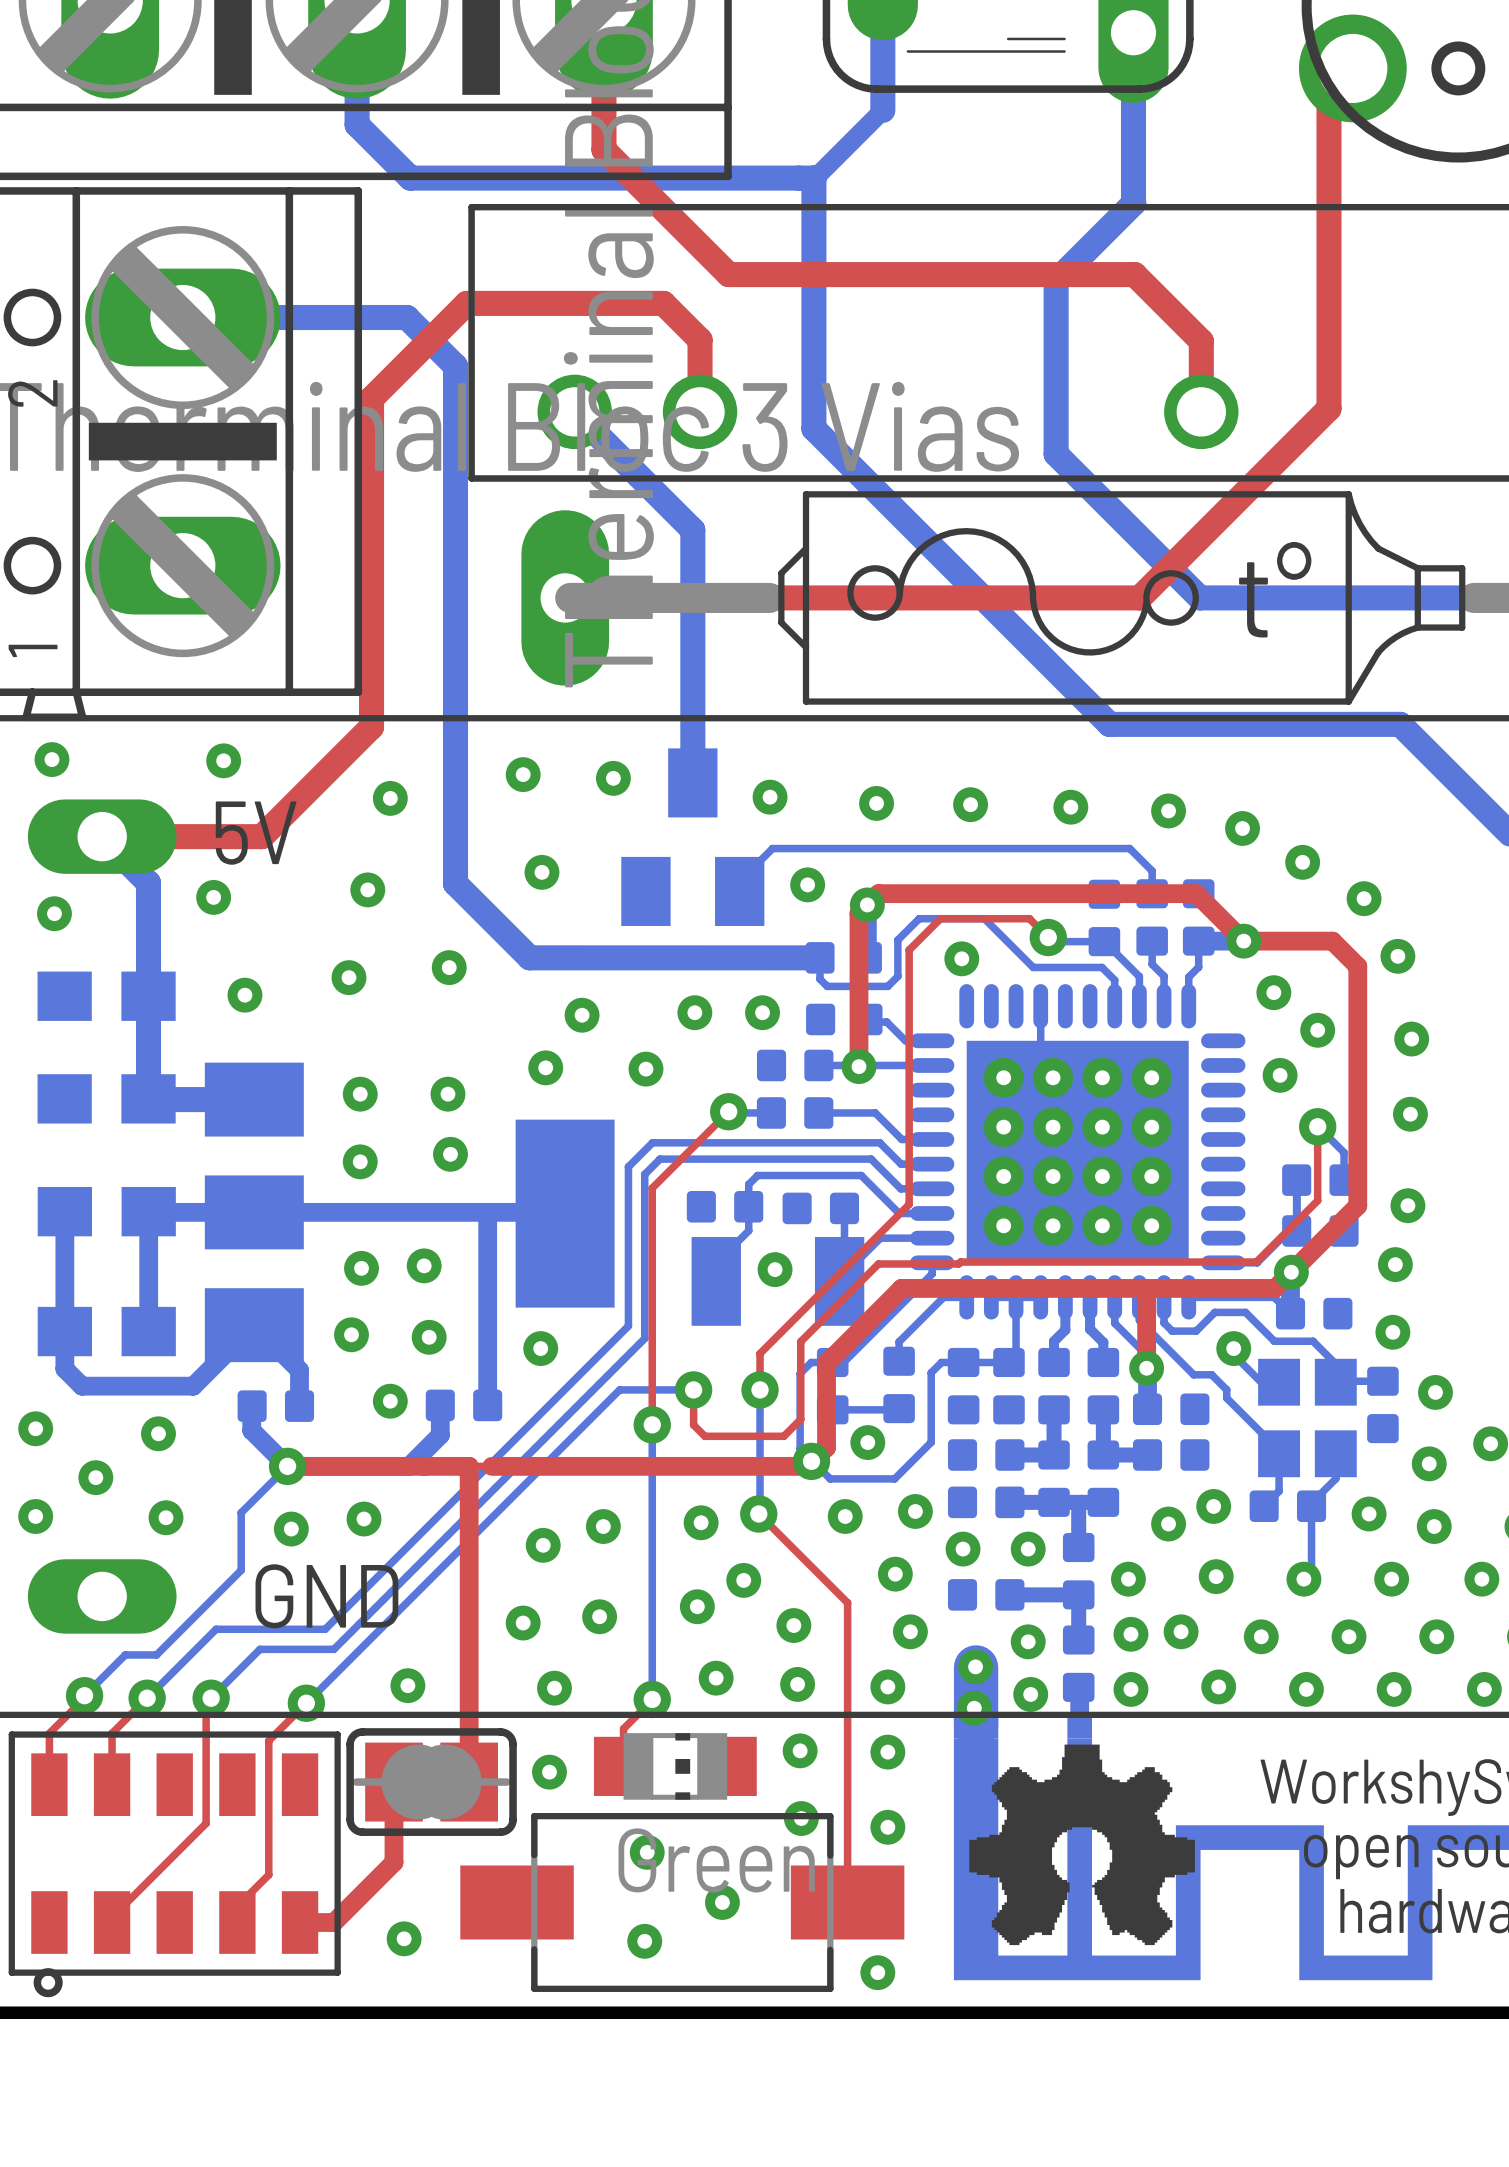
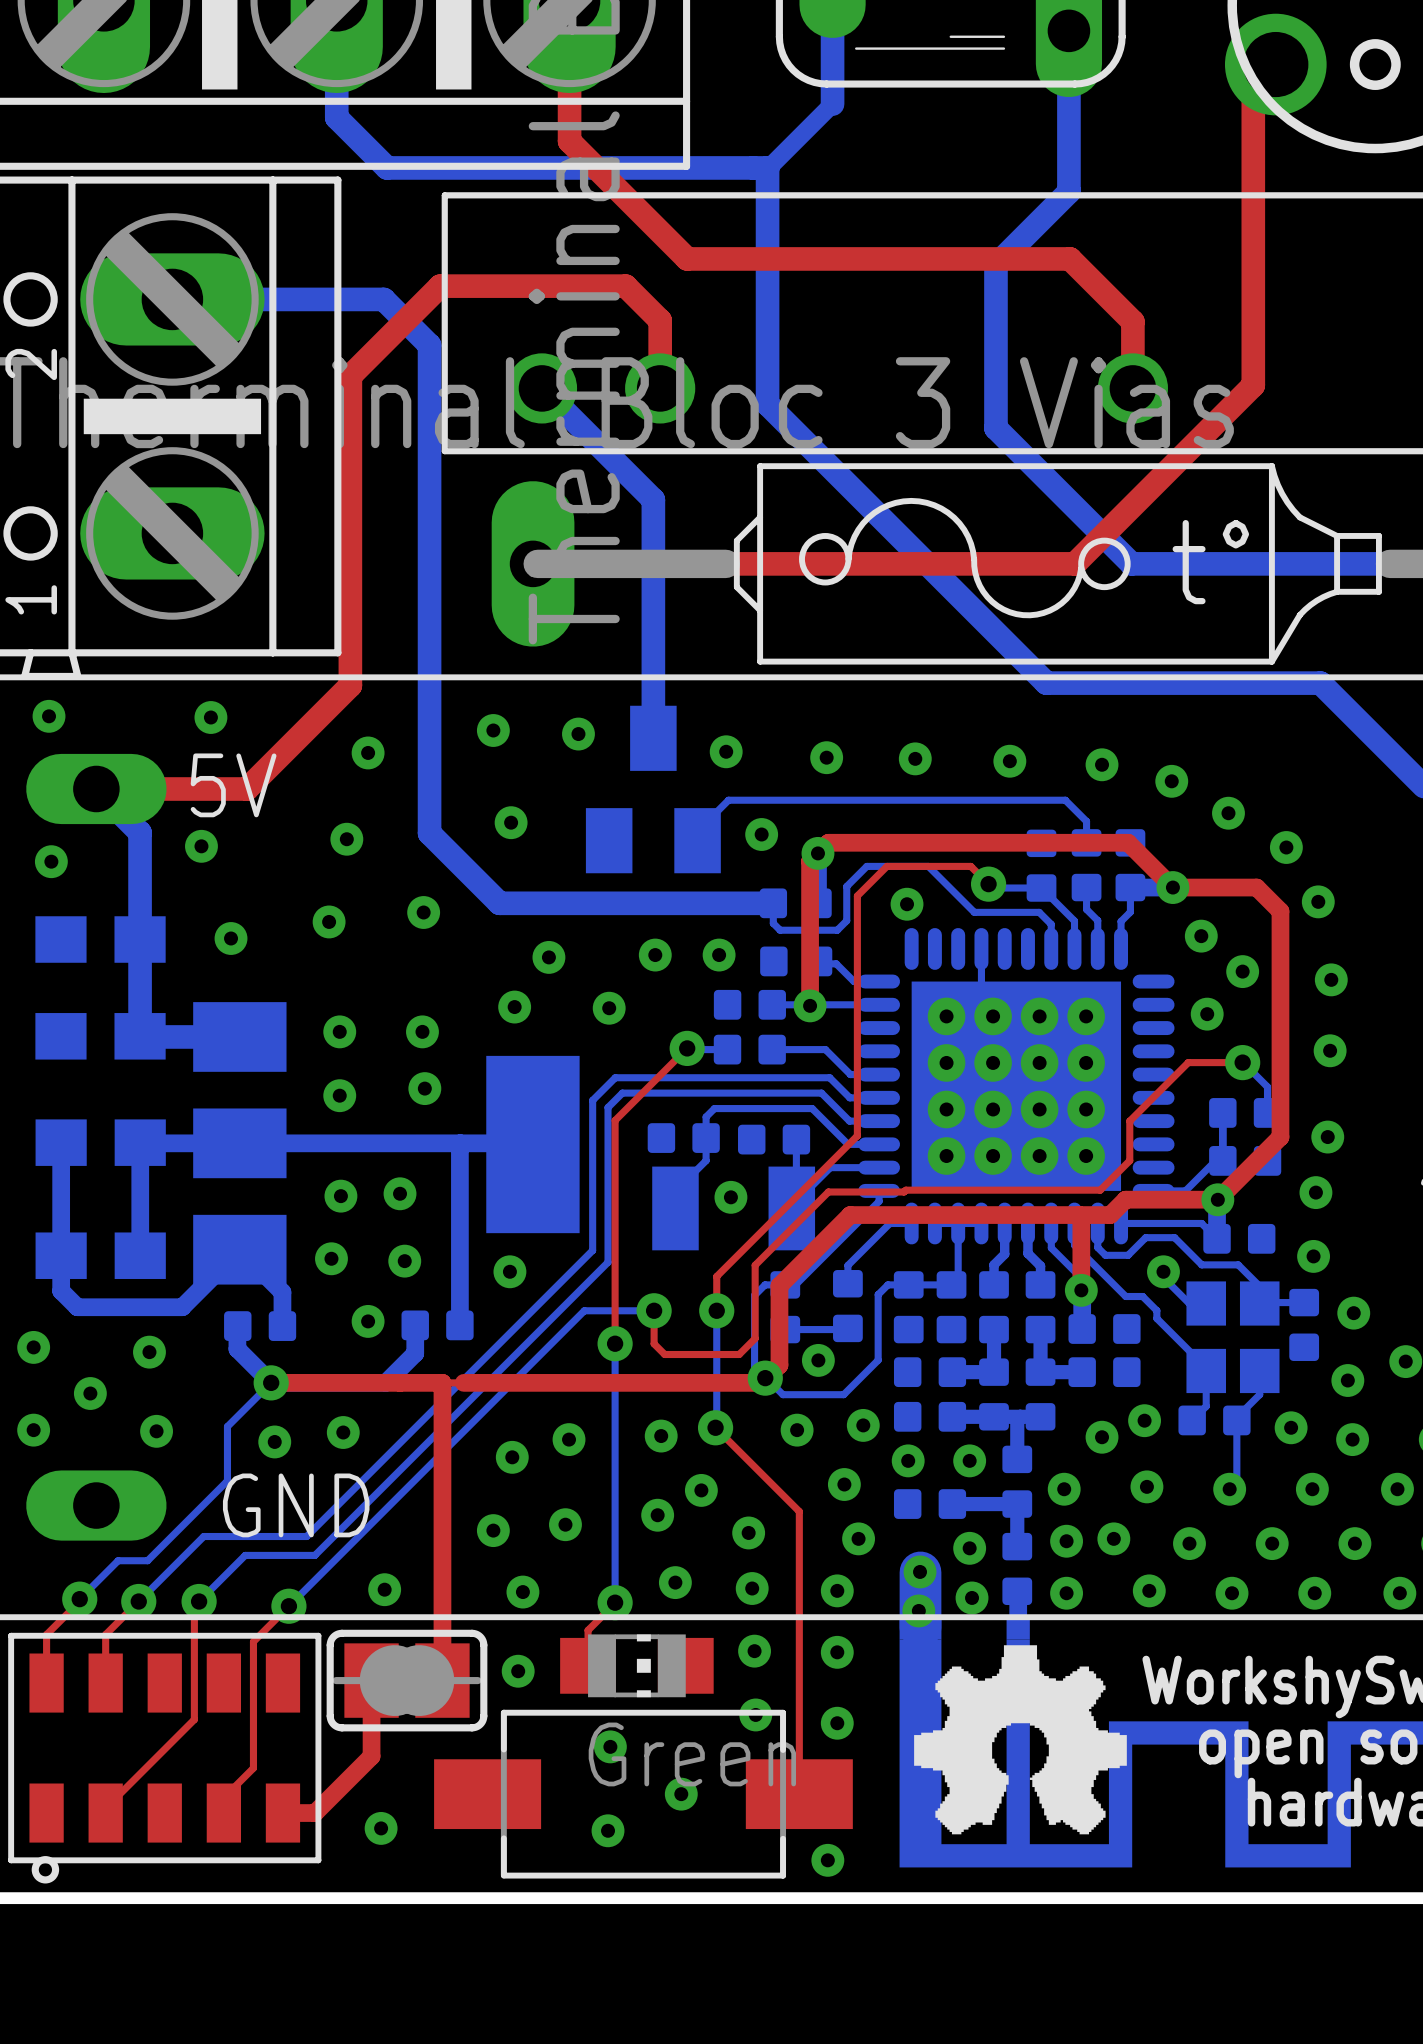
top track: (1317, 1126) (1317, 1200) (1256, 1262) (1166, 1262) -> (1242, 1062) (1188, 1062) (1129, 1121) (1129, 1160) (1100, 1190)
top track: (1291, 1272) (1275, 1288) (1177, 1288) -> (1217, 1199) (1125, 1199) (1110, 1215)

